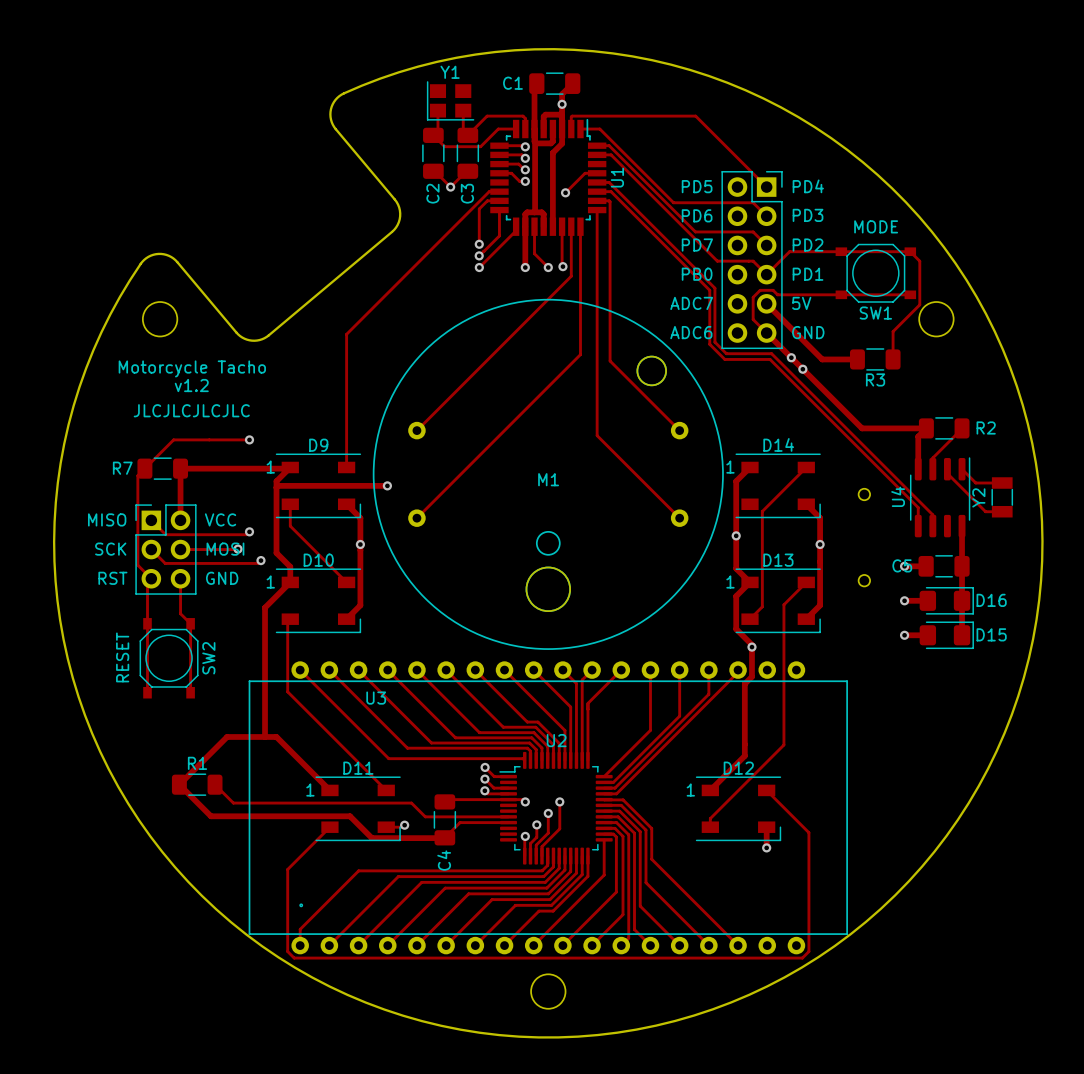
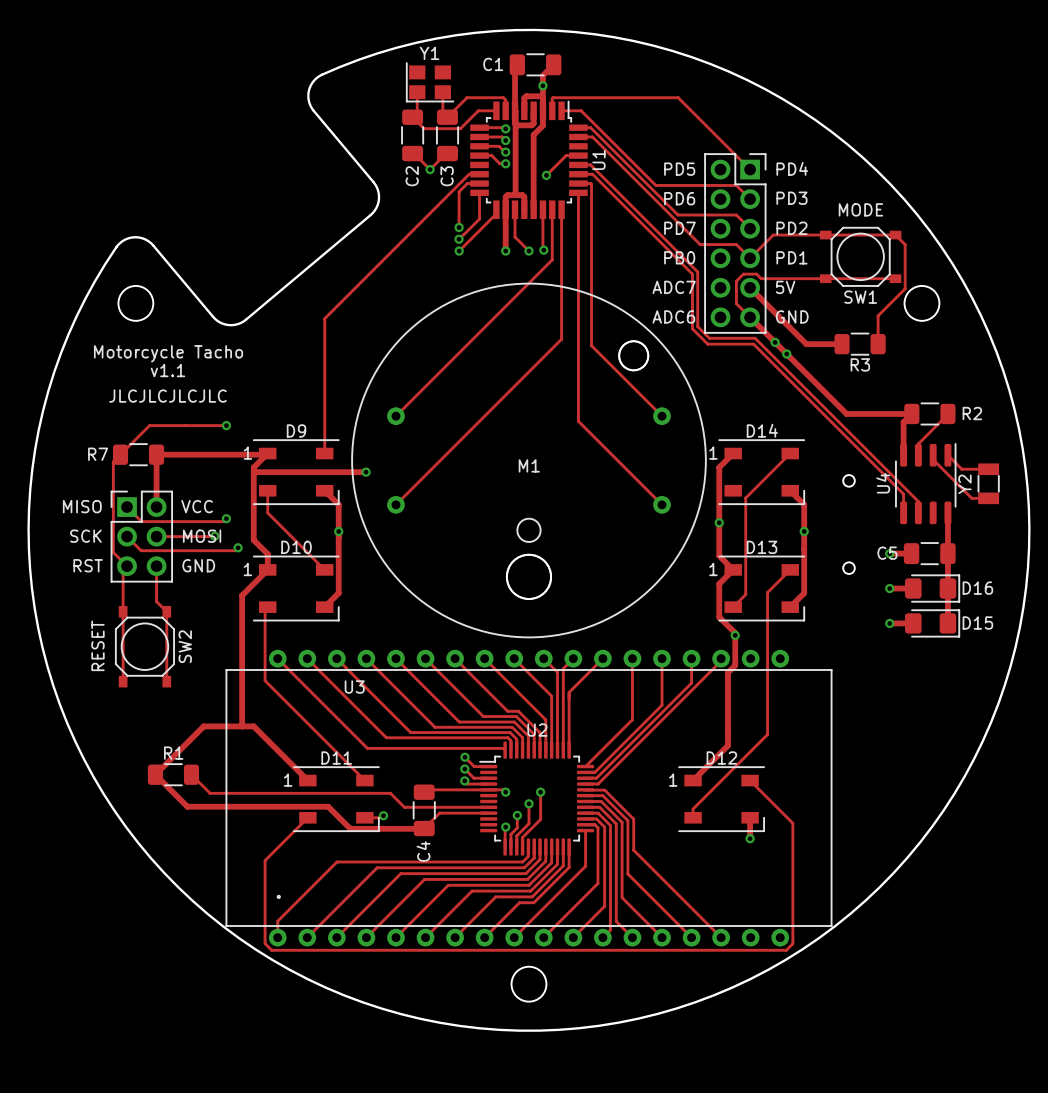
text: v1.2 (191, 385) -> v1.1 (167, 370)

